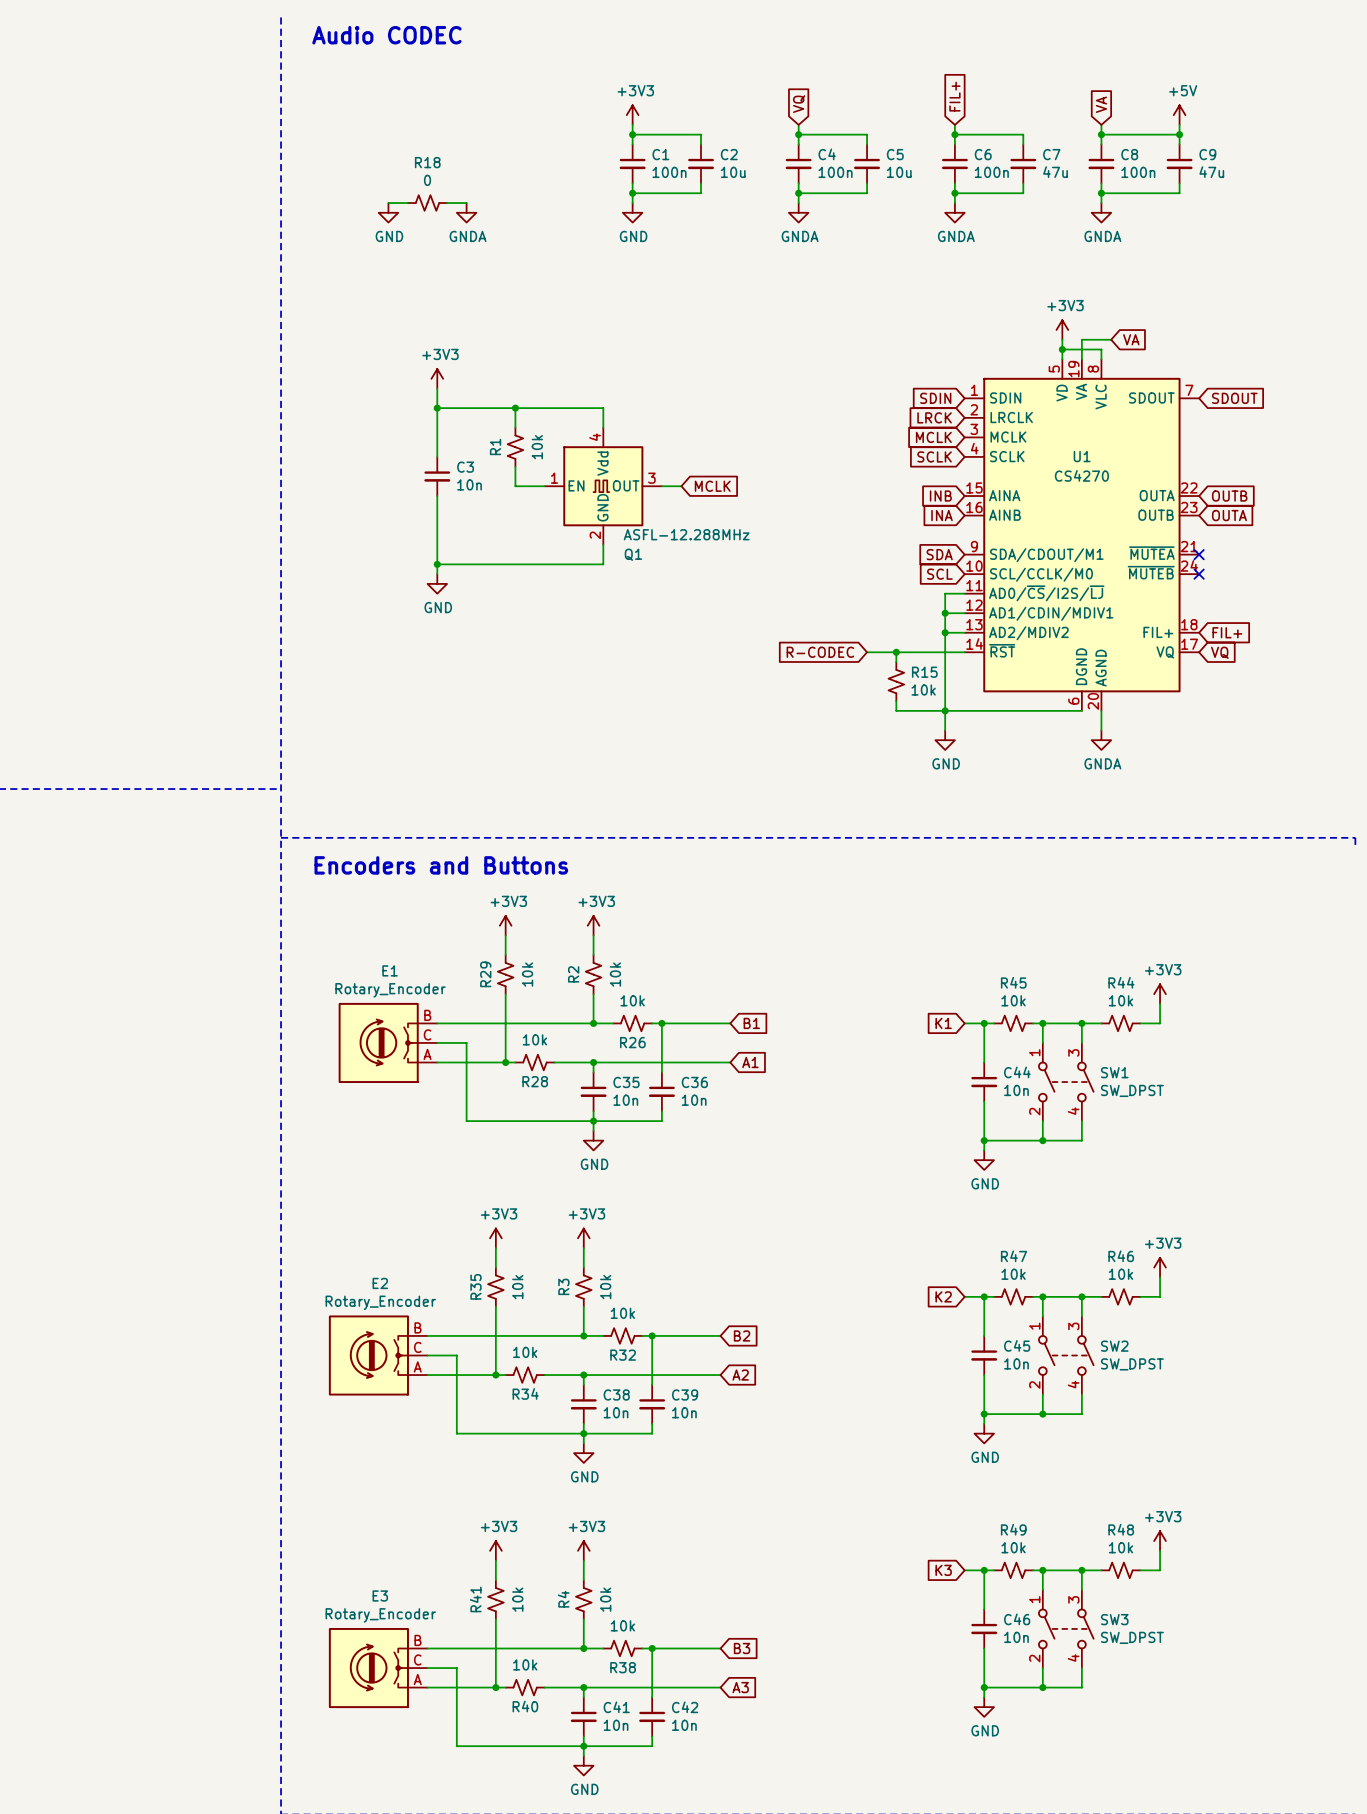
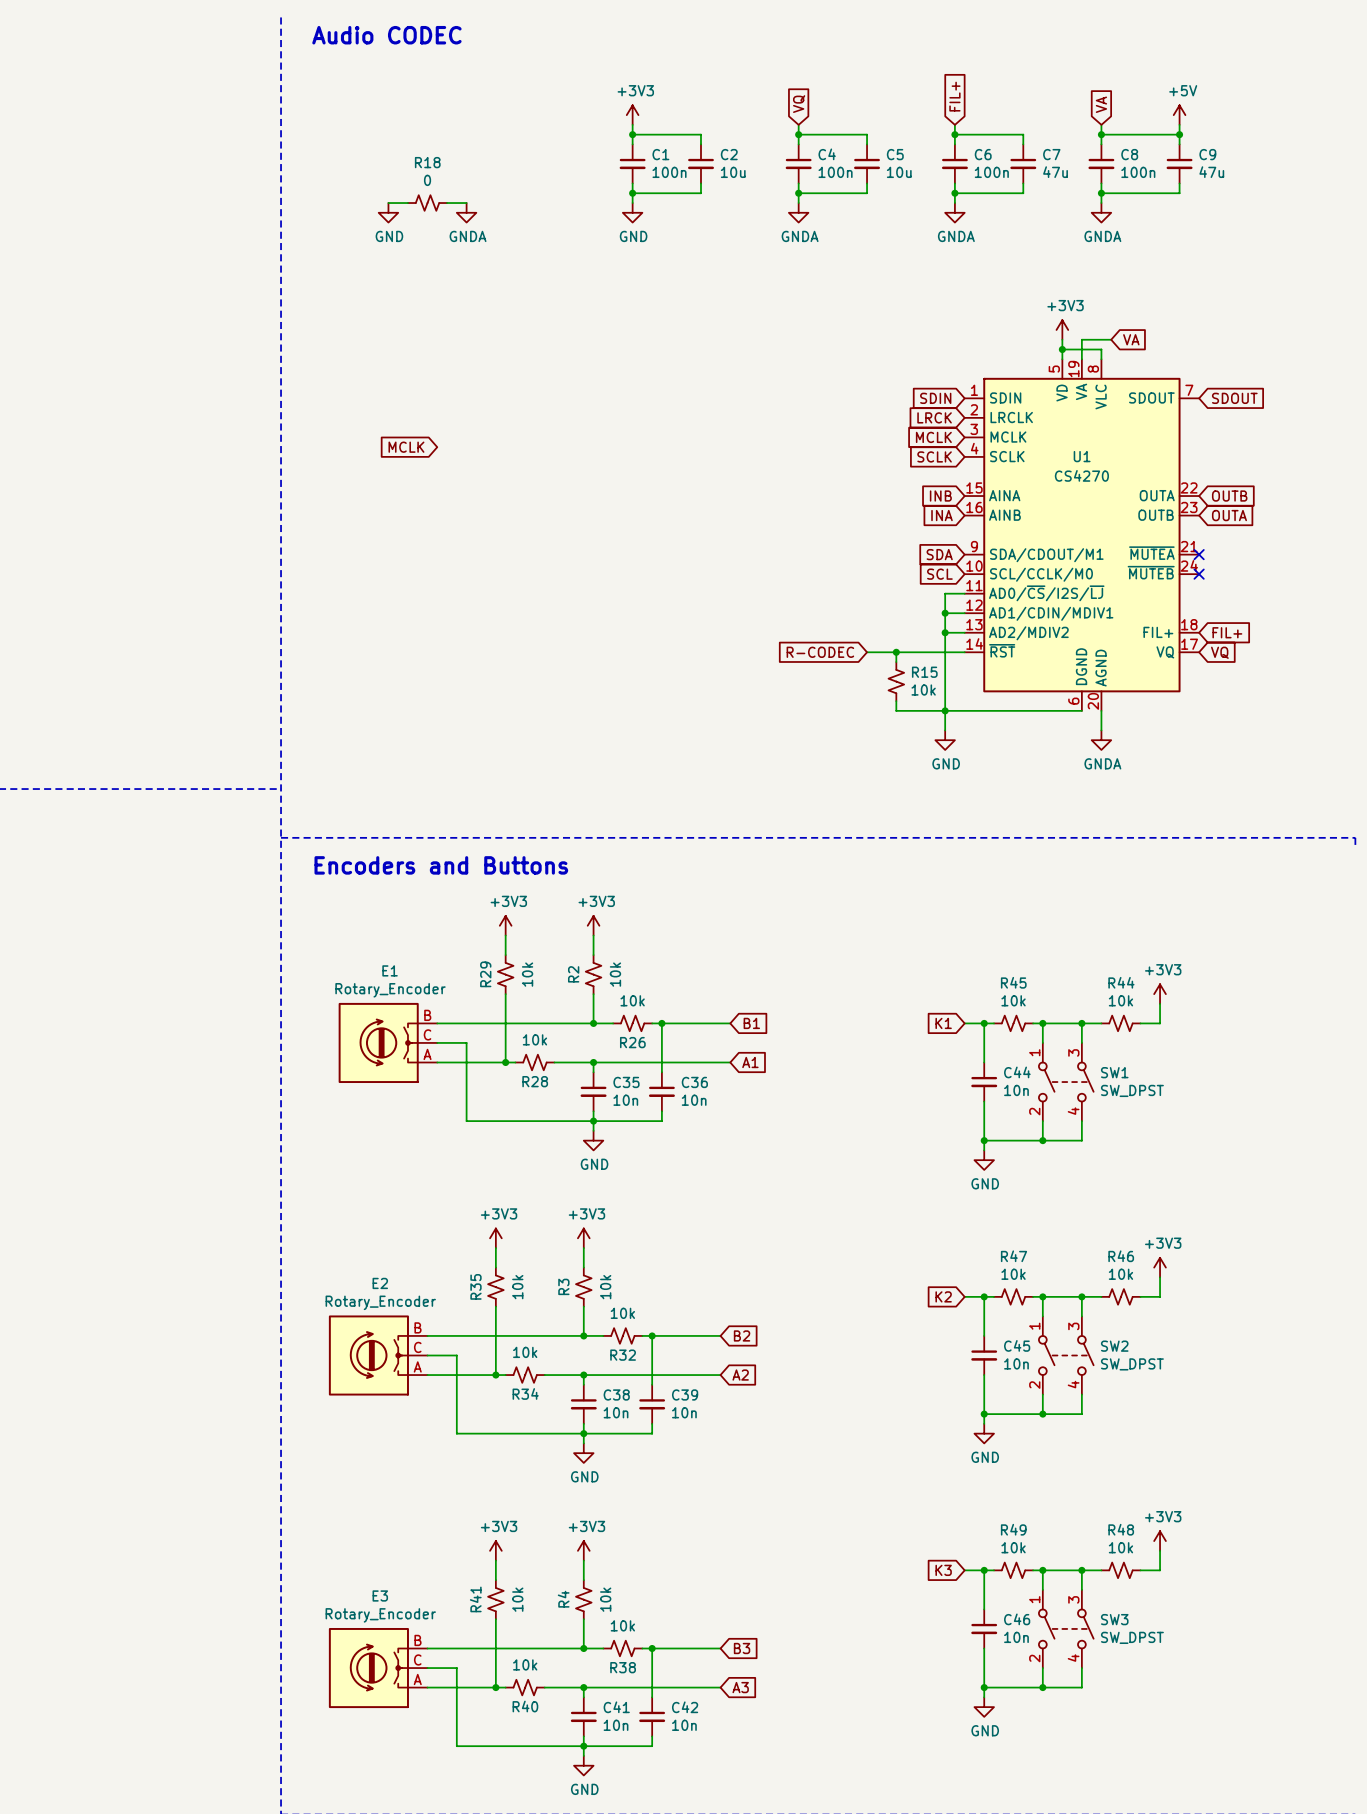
power symbol: +3V3 (437, 378) -> none
wire: (437, 388) (437, 456) -> none
wire: (437, 408) (603, 408) (603, 427) -> none
junction: (437, 408) -> none
wire: (515, 408) (515, 427) -> none
junction: (515, 408) -> none
global label: none -> MCLK (406, 447)
R1: 10k (515, 447) -> none
wire: (515, 466) (515, 486) (544, 486) -> none
C3: 10n (437, 476) -> none
Q1: ASFL-12.288MHz (603, 486) -> none
wire: (661, 486) (681, 486) -> none
global label: MCLK (712, 486) -> none
wire: (437, 496) (437, 574) -> none
wire: (603, 544) (603, 564) (437, 564) -> none
junction: (437, 564) -> none
power symbol: GND (437, 583) -> none

